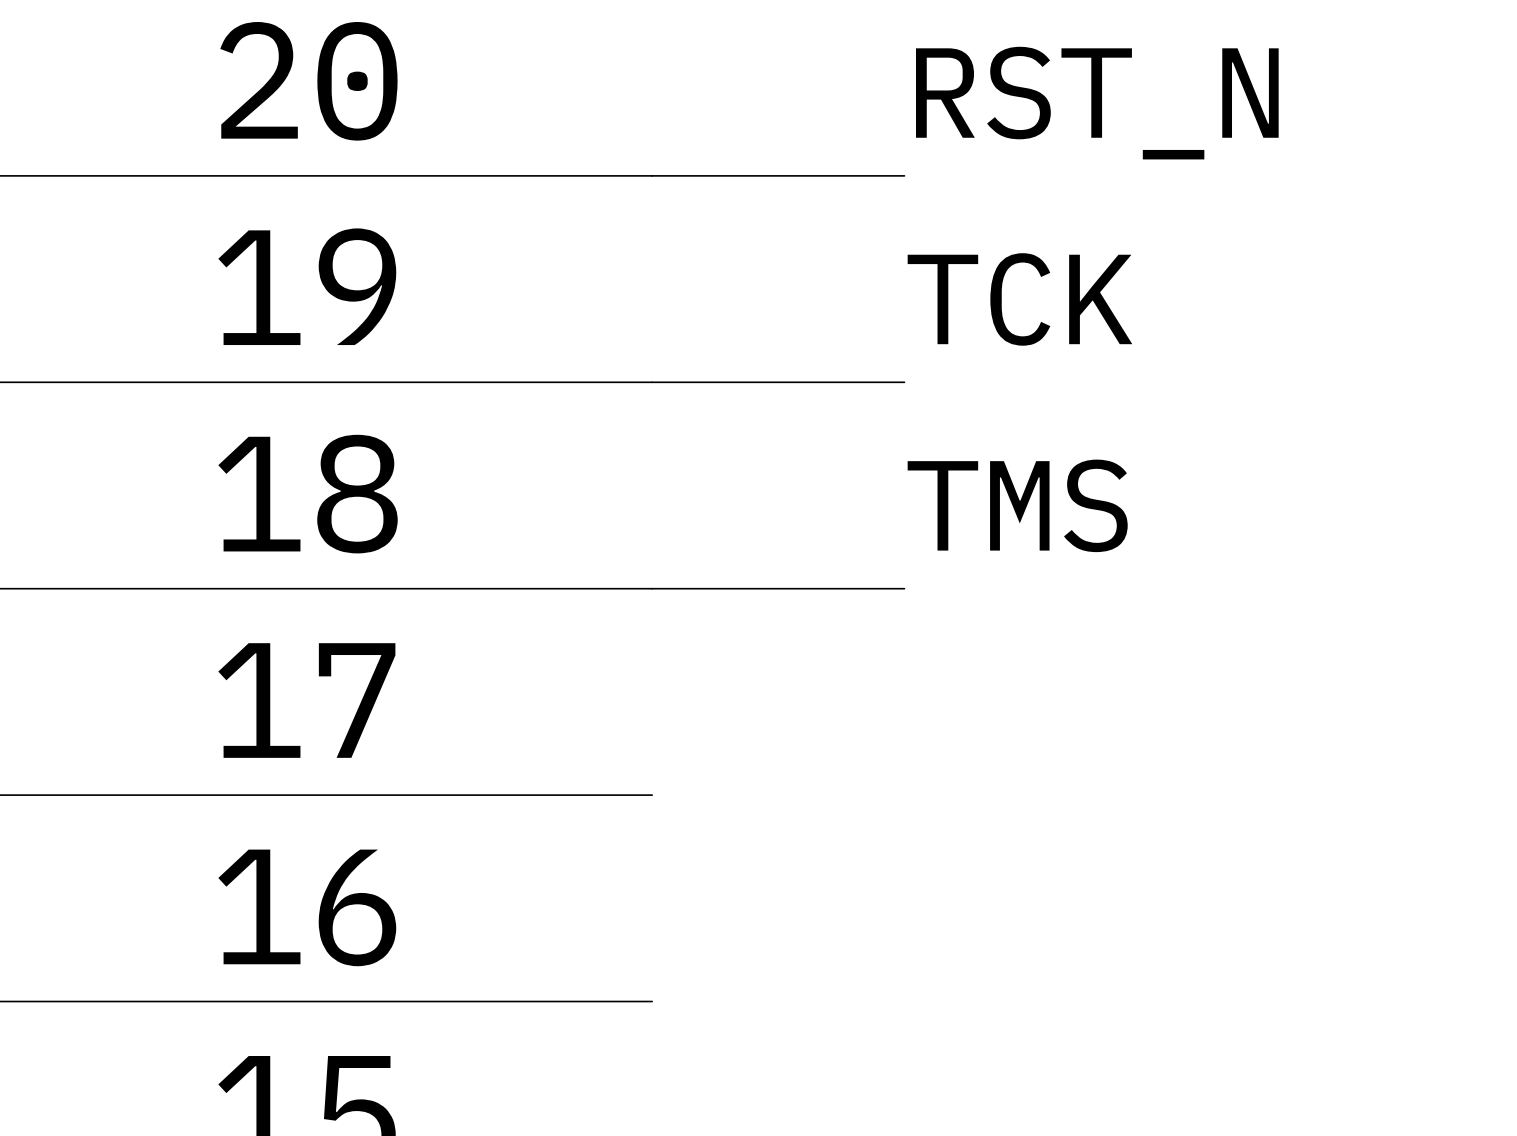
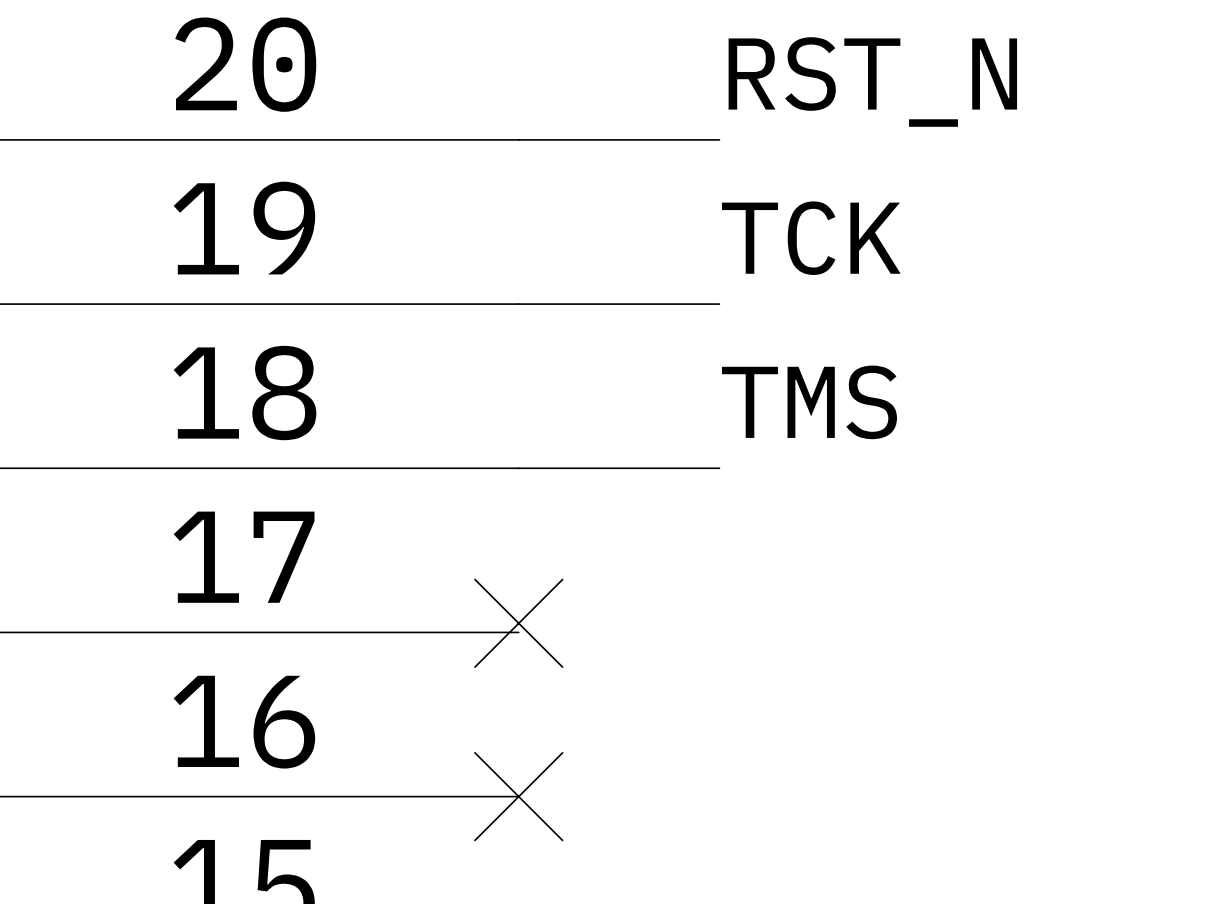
no-connect mark: none -> (518, 623)
no-connect mark: none -> (518, 796)

